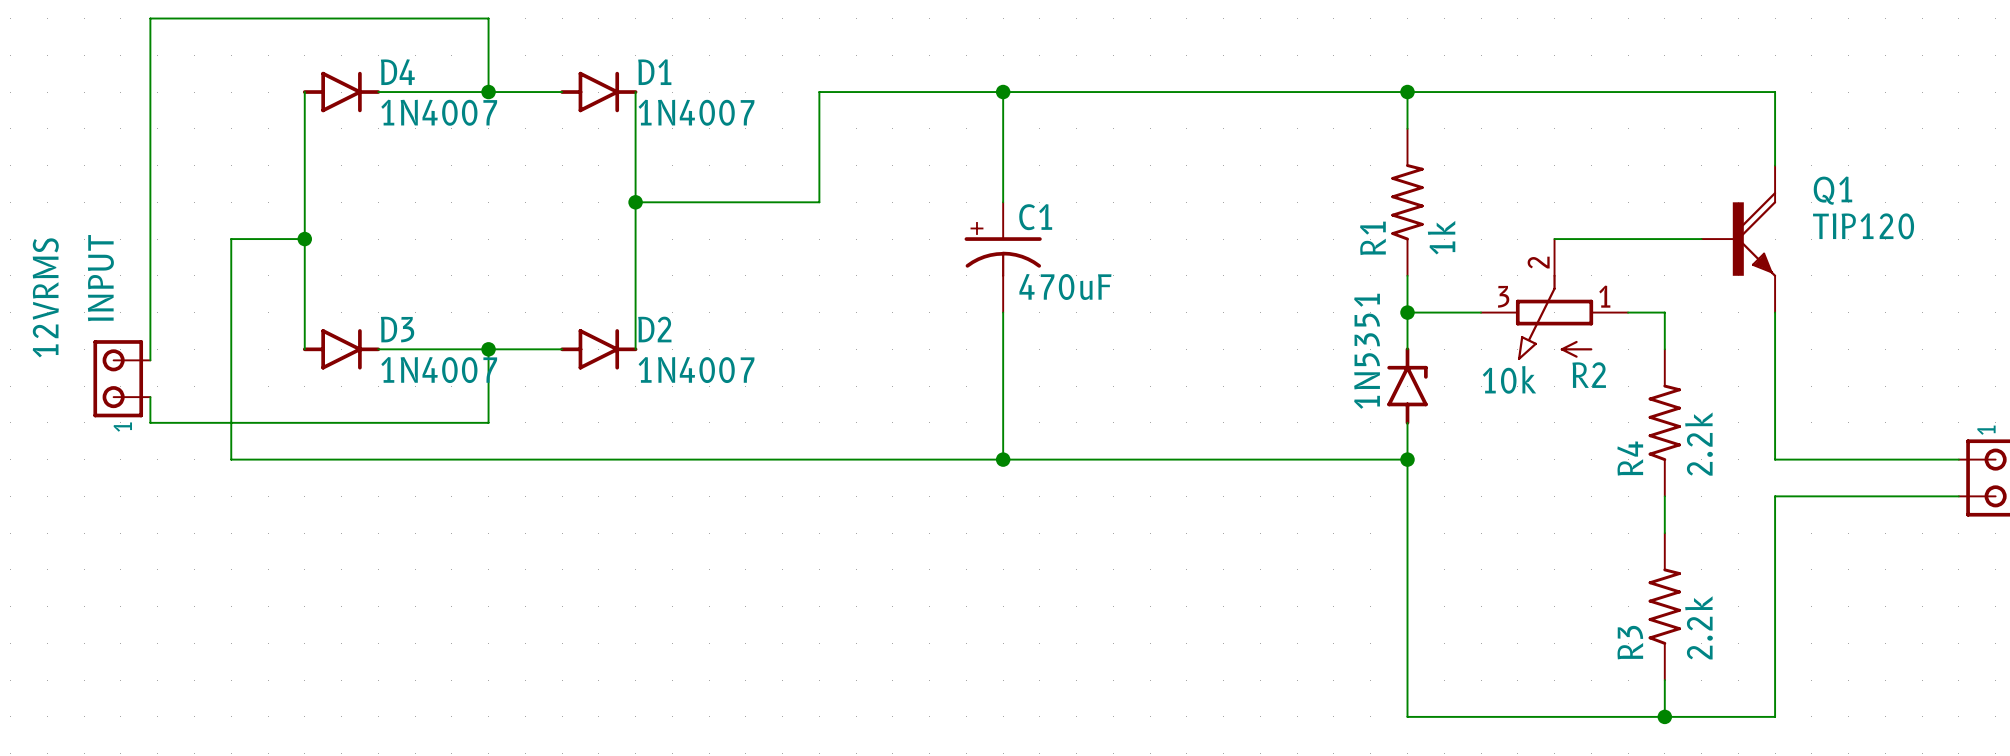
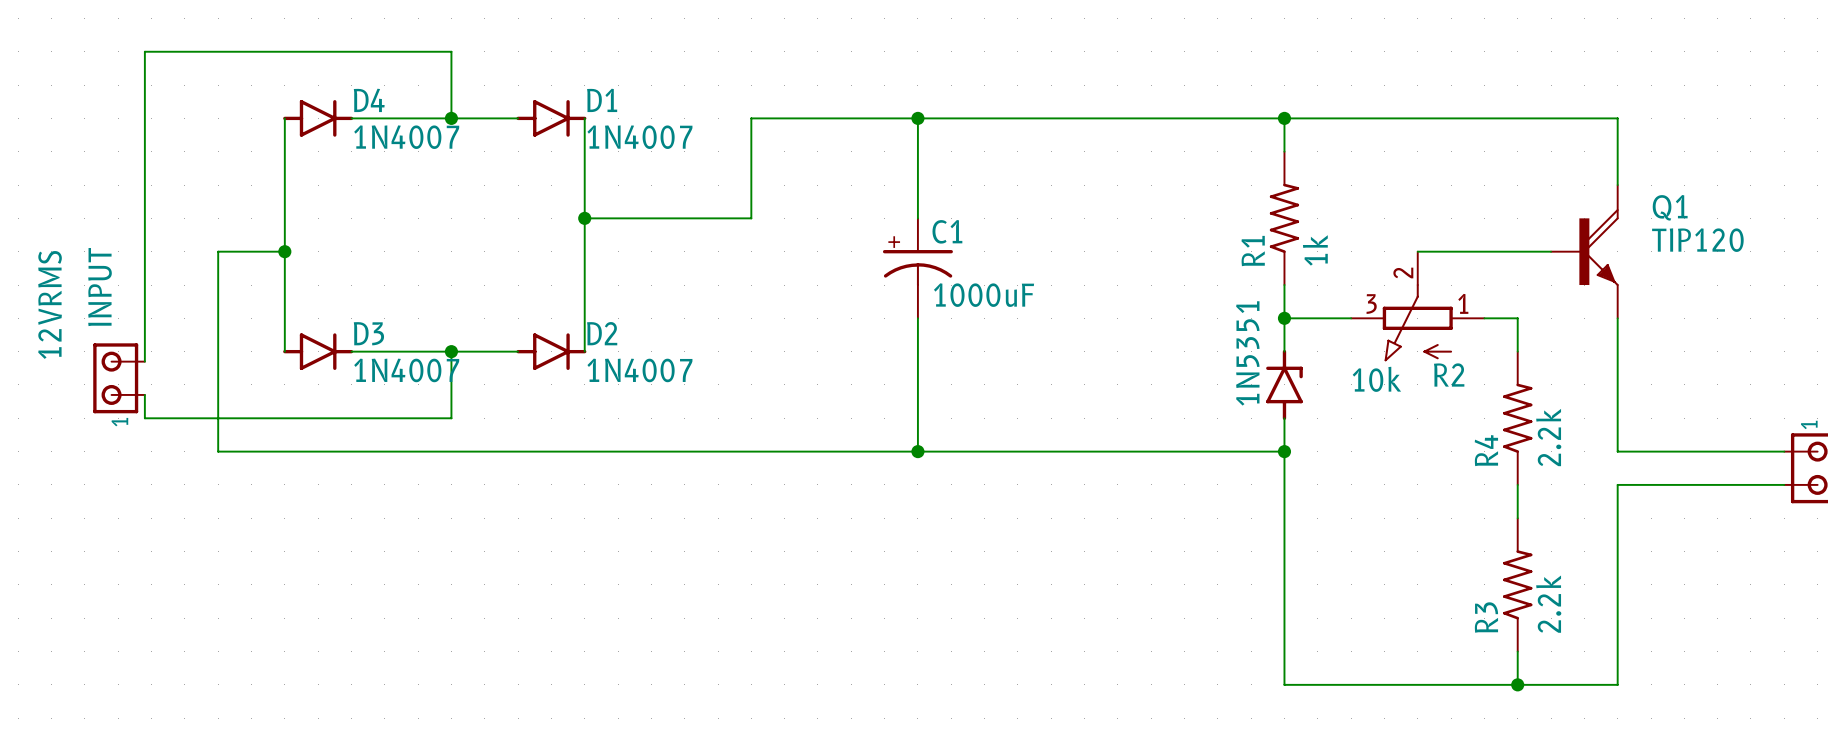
C1 value: 470uF (1065, 286) -> 1000uF (984, 295)

